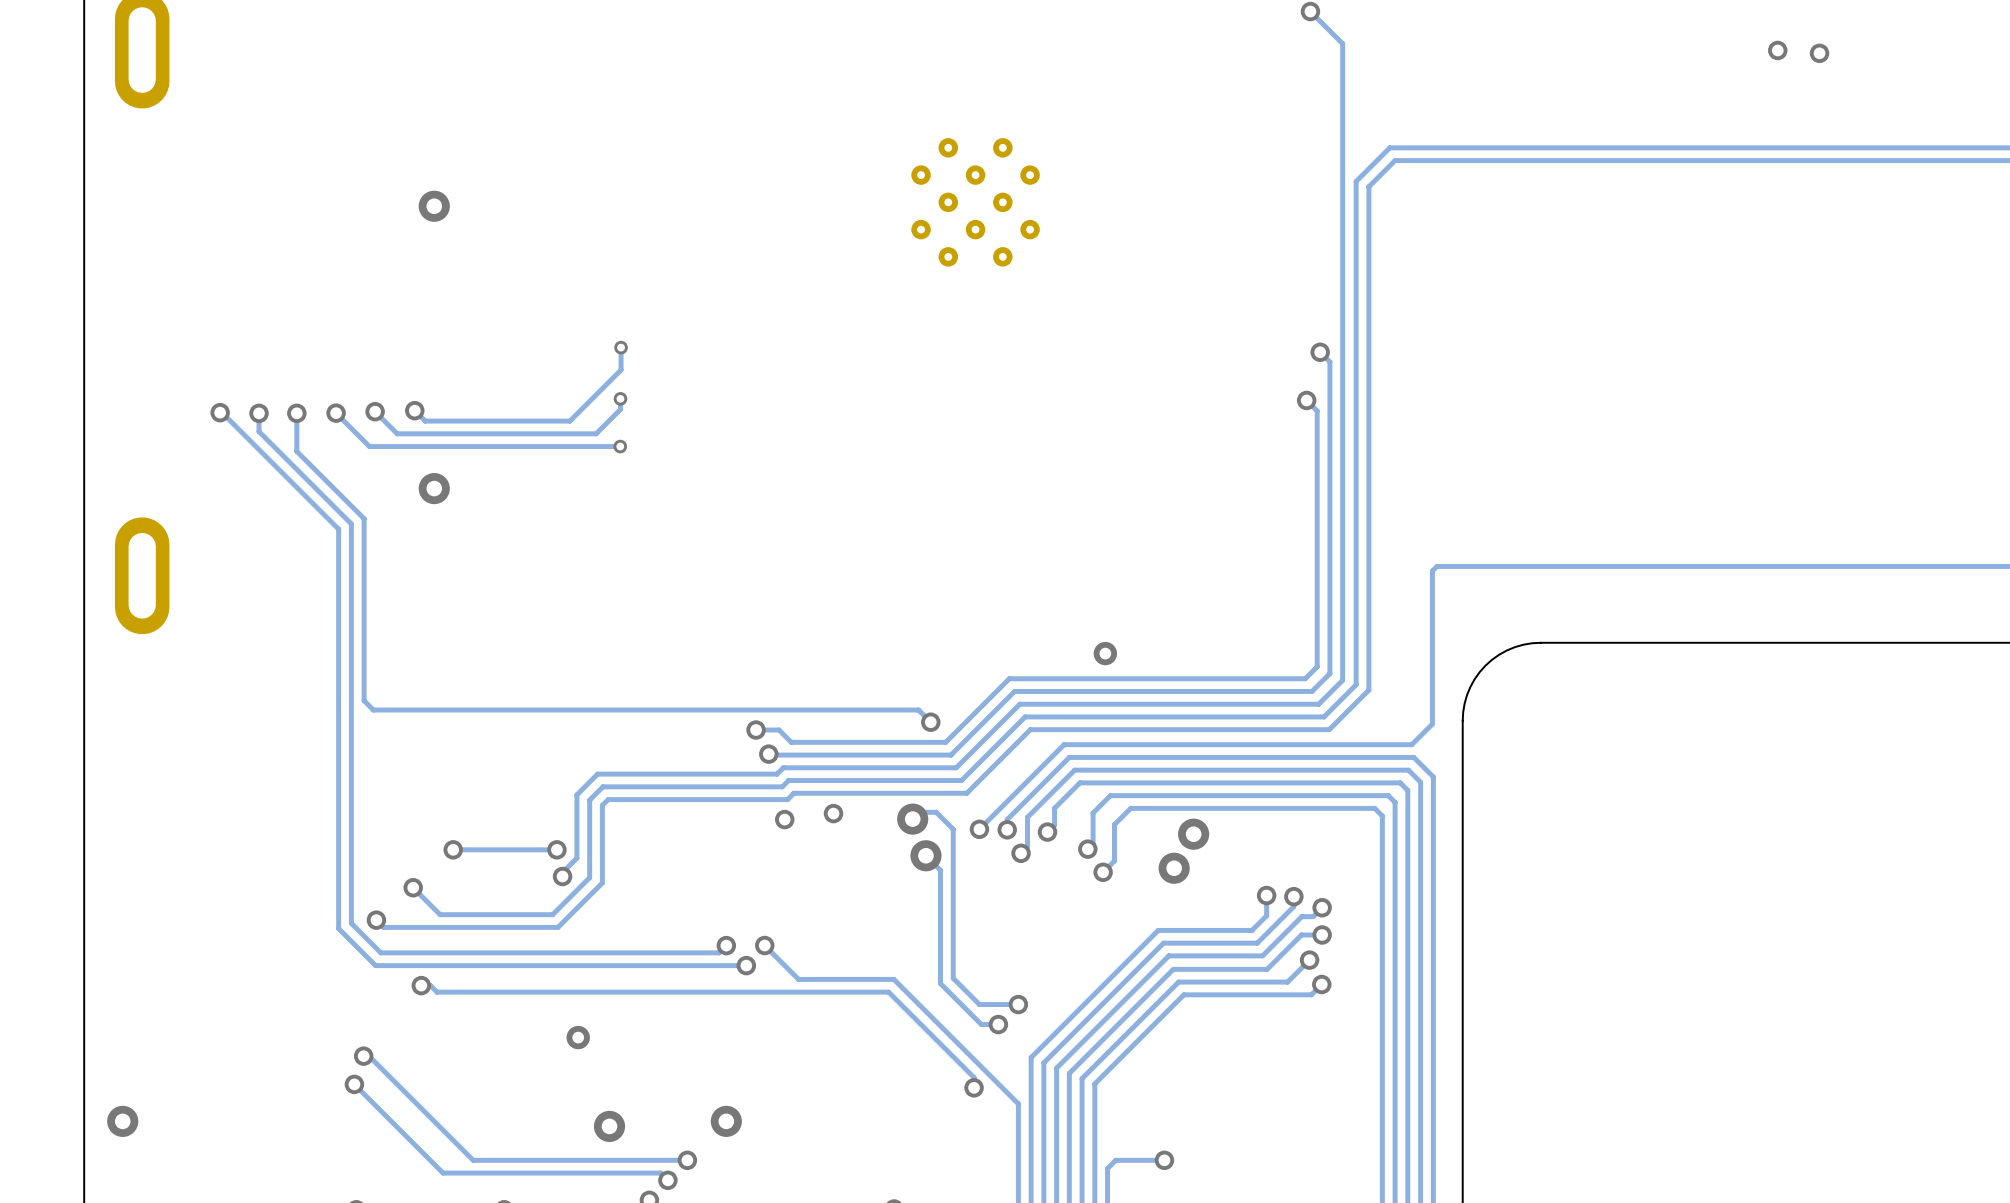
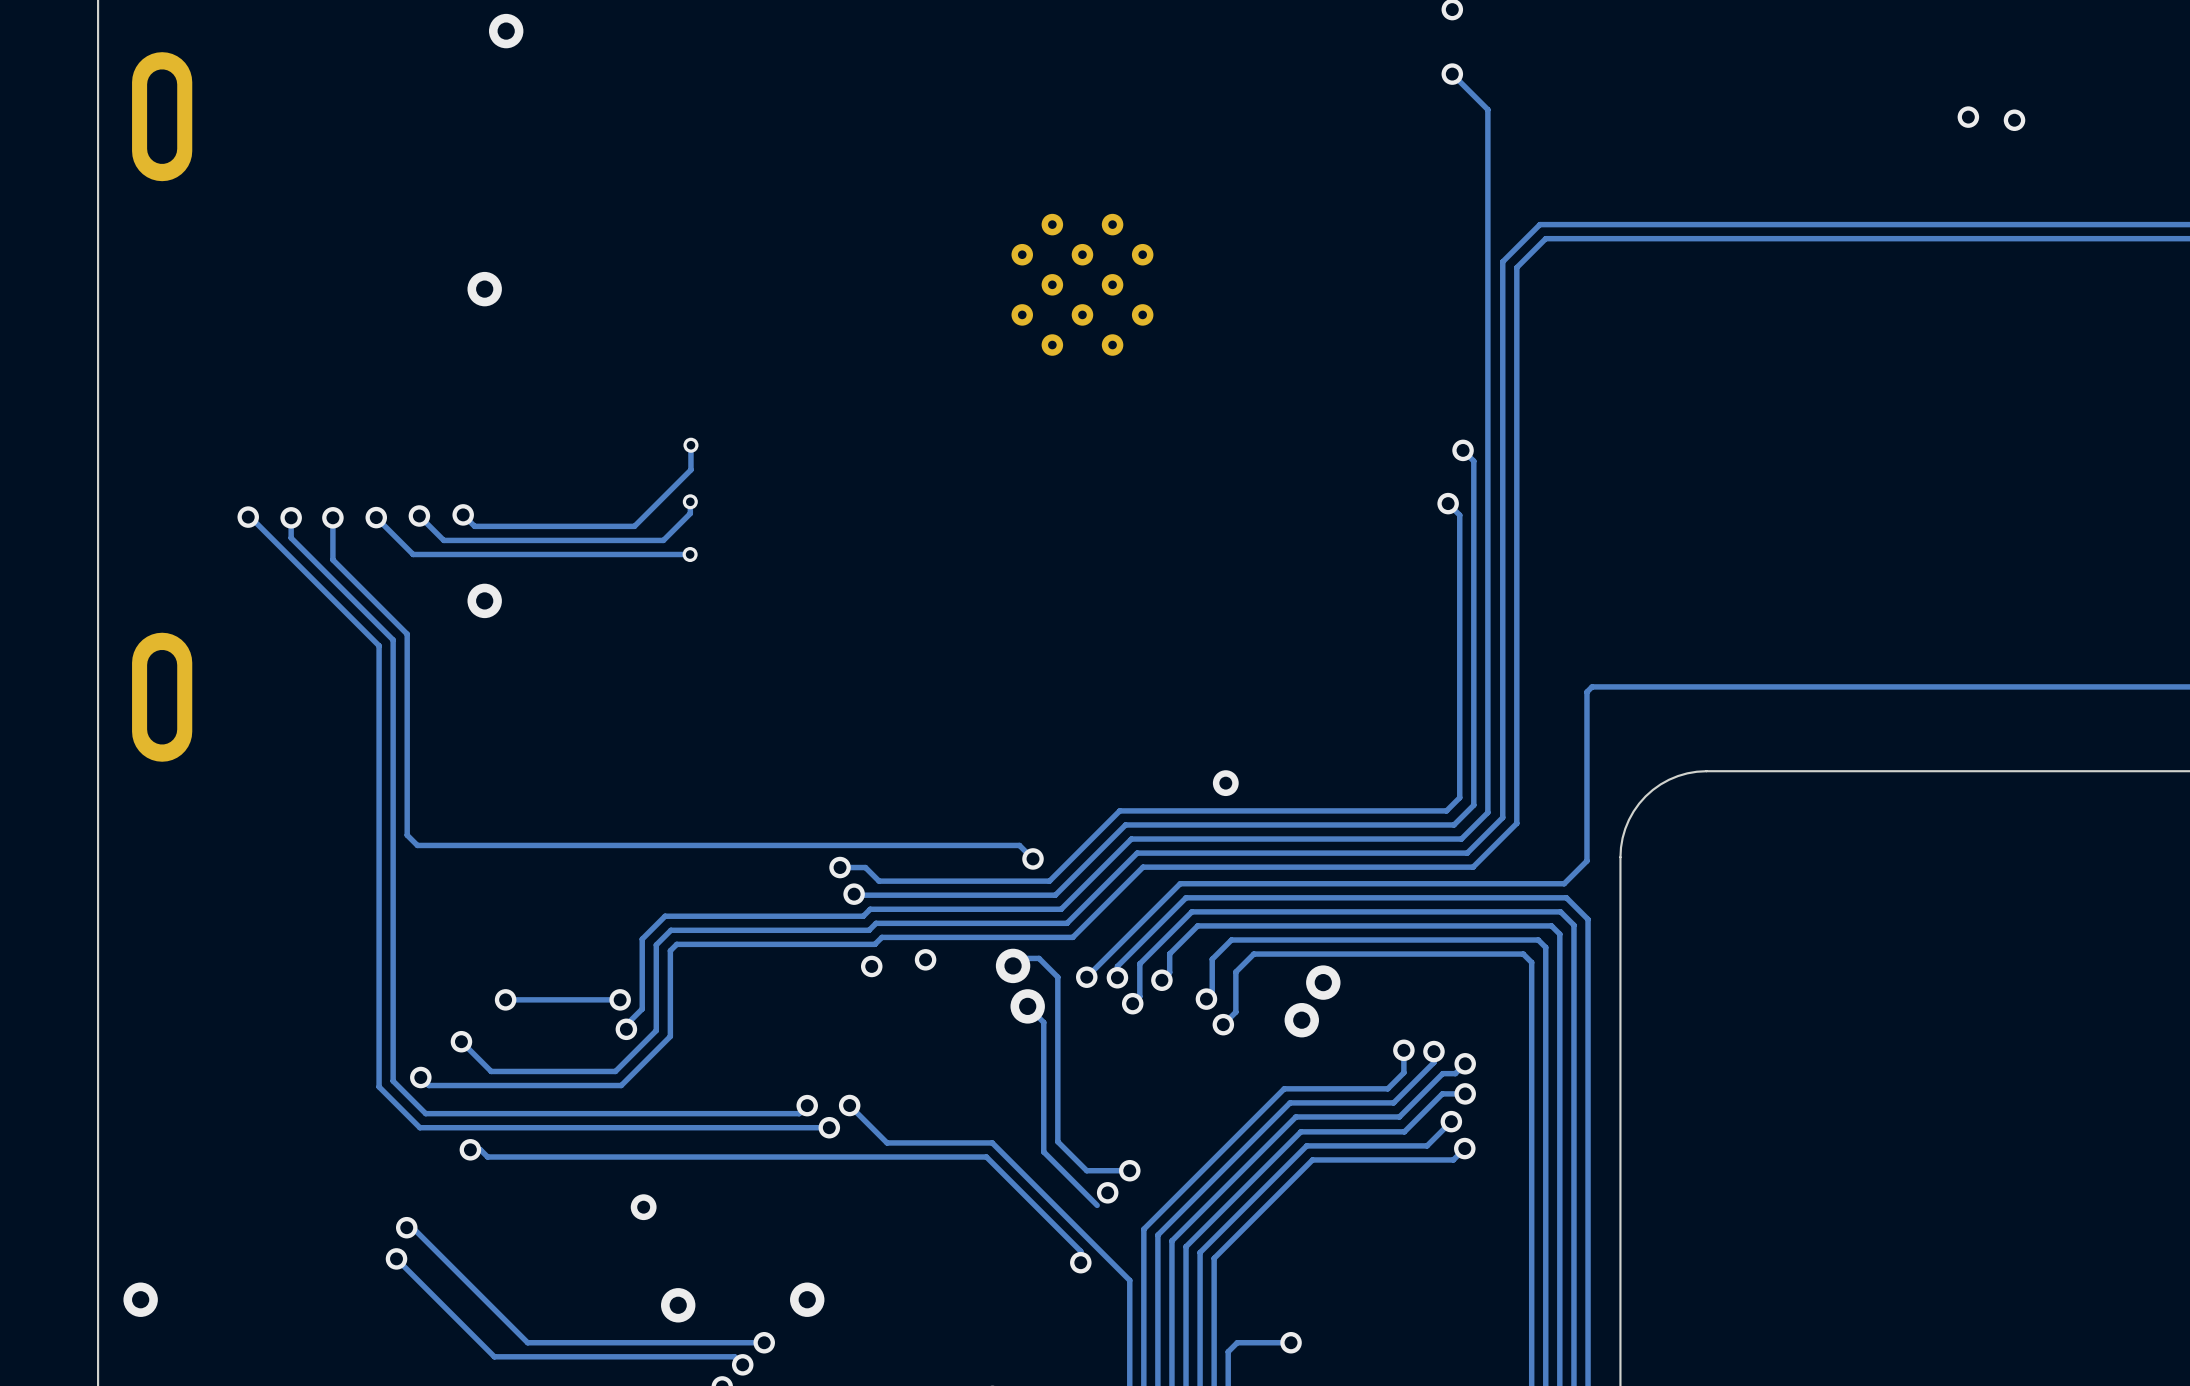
track: (940, 983) (981, 1024) (998, 1024) -> (1043, 1147) (1043, 1151) (1097, 1205)

